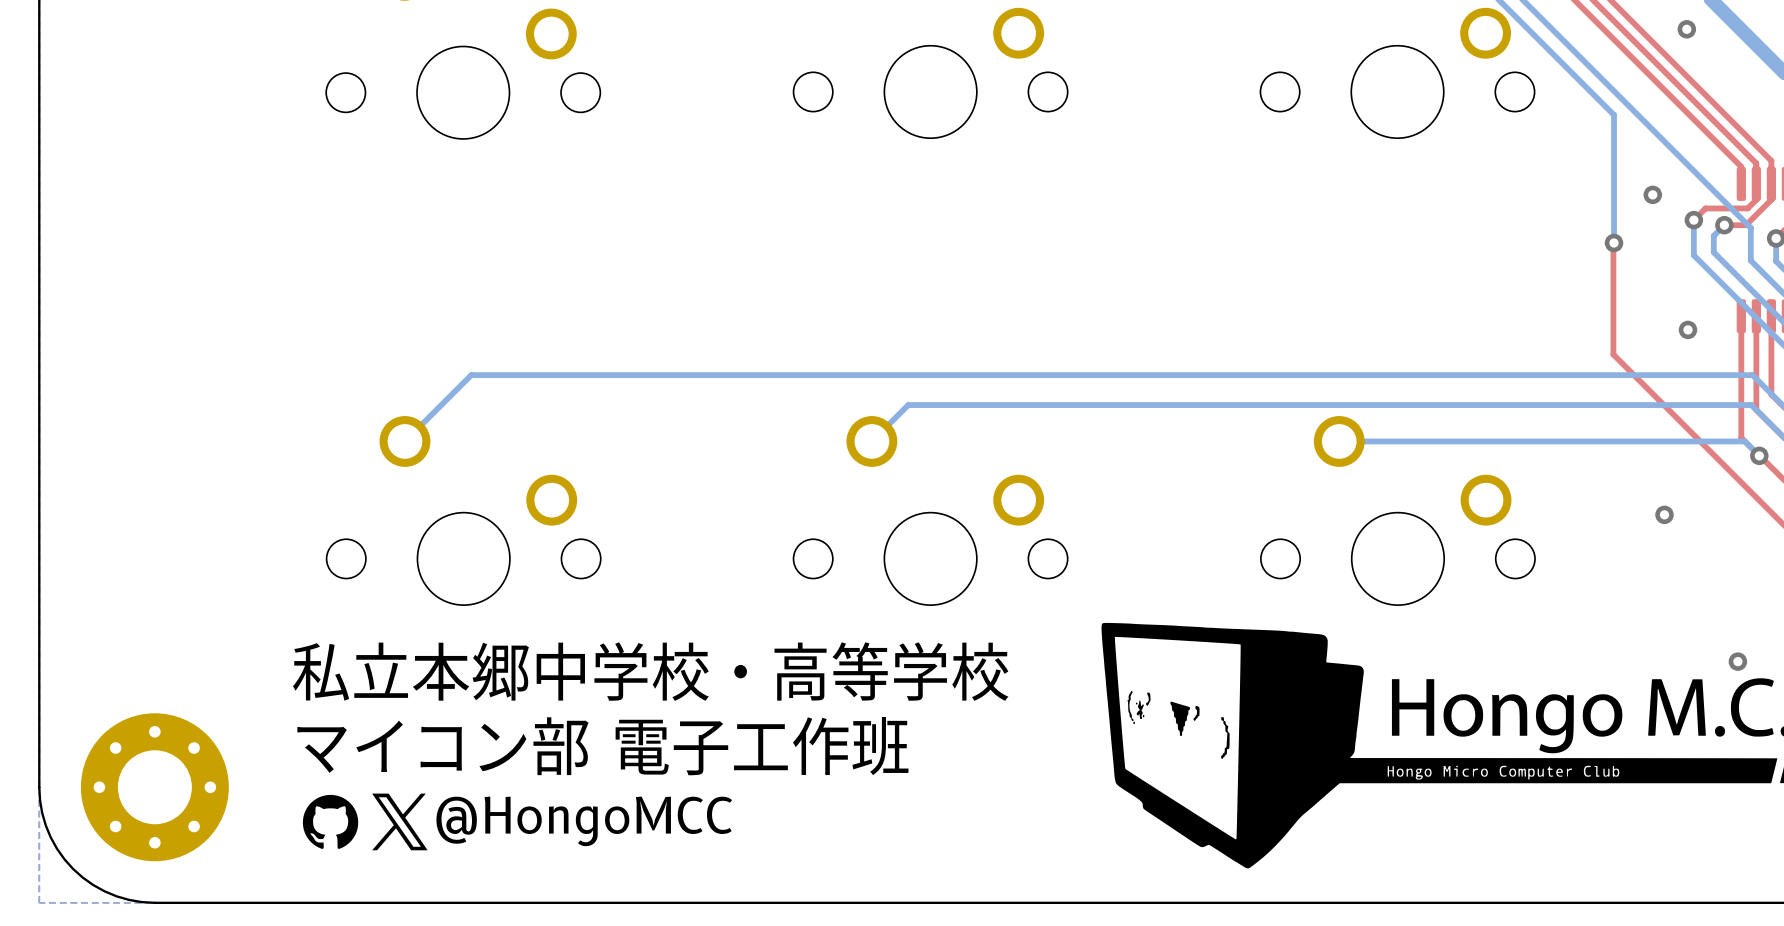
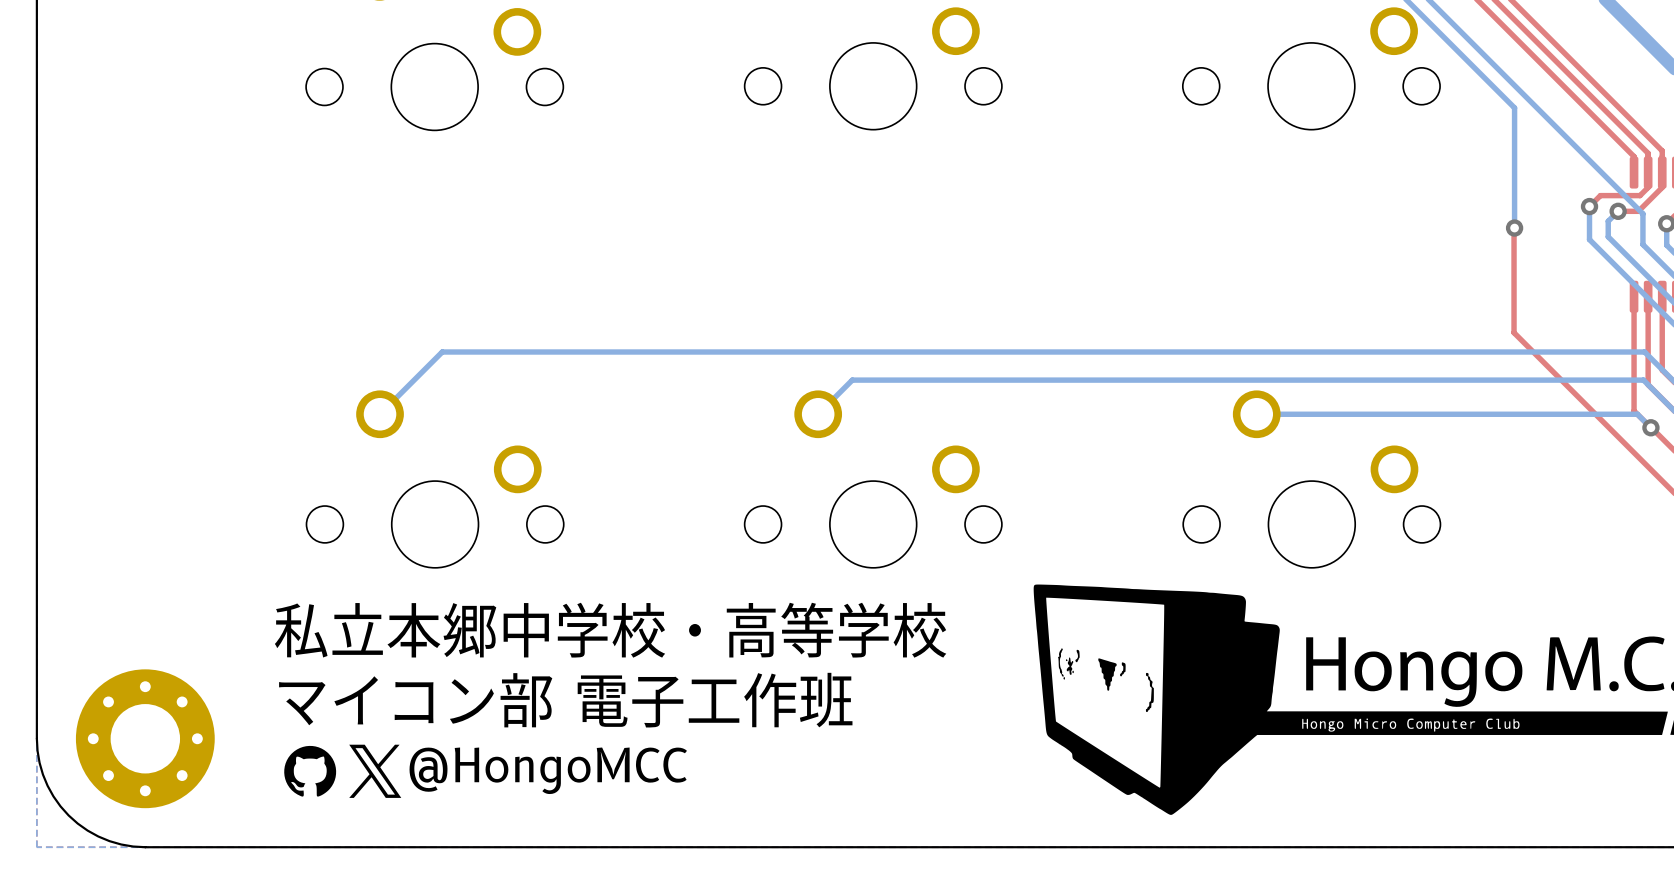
via: (1686, 29) -> none
via: (1652, 194) -> none
via: (1687, 329) -> none
via: (1664, 514) -> none
via: (1737, 661) -> none

